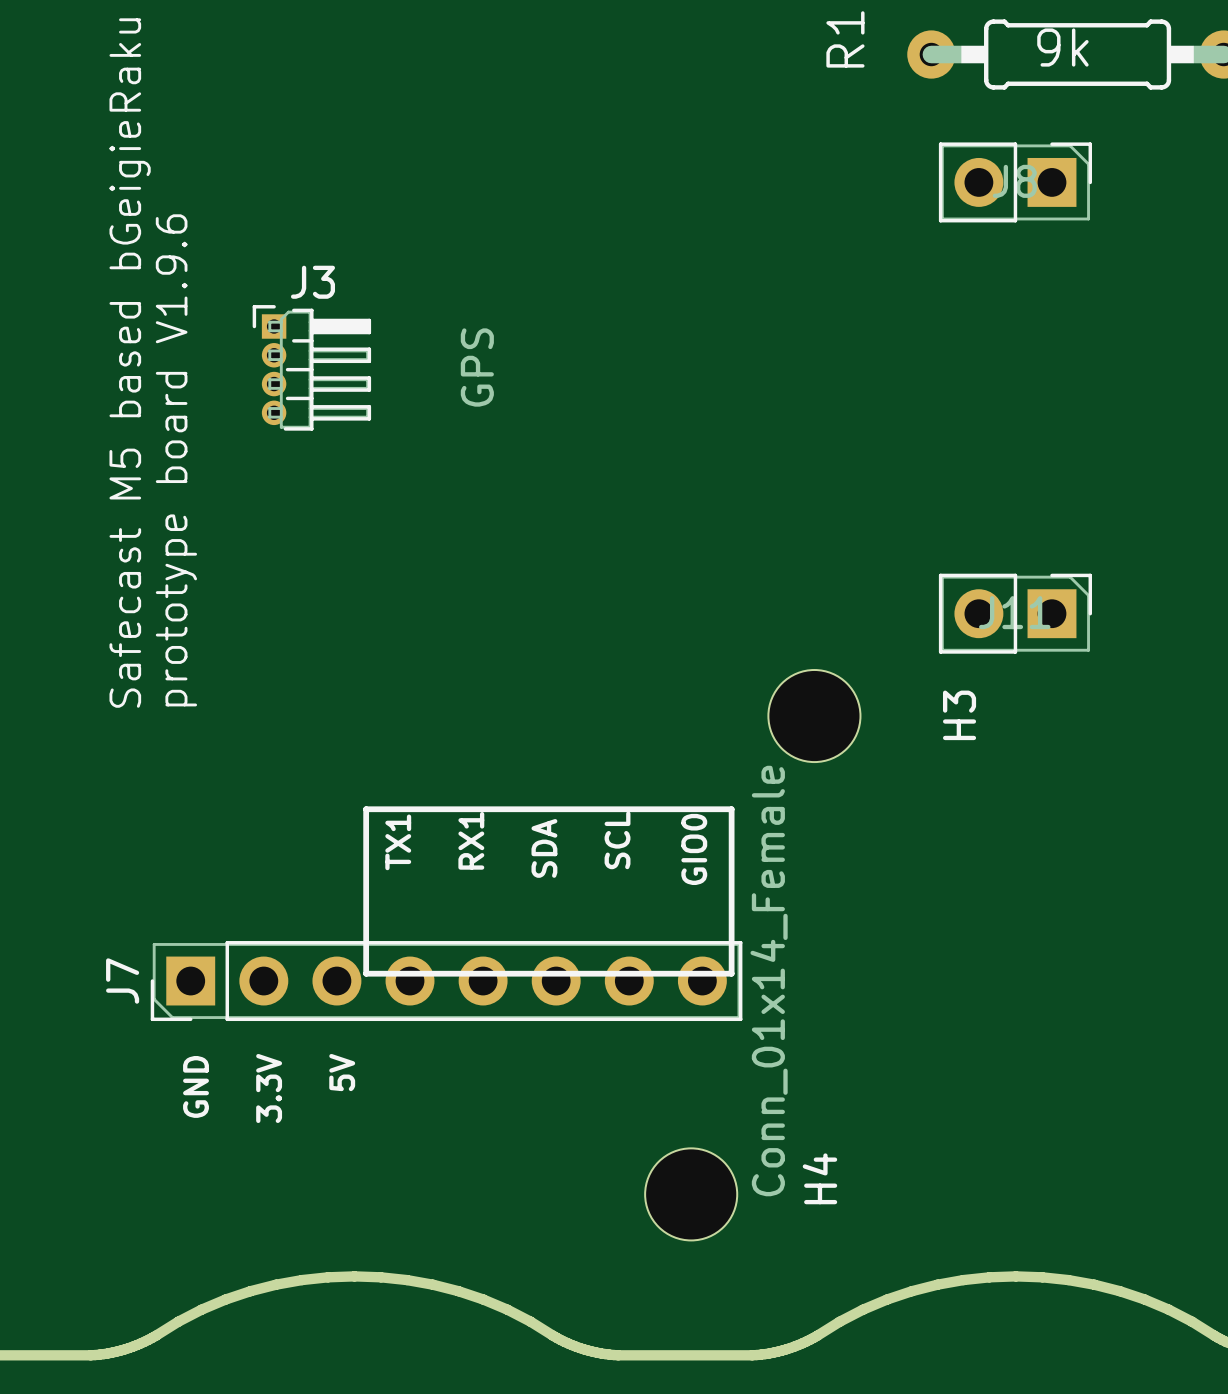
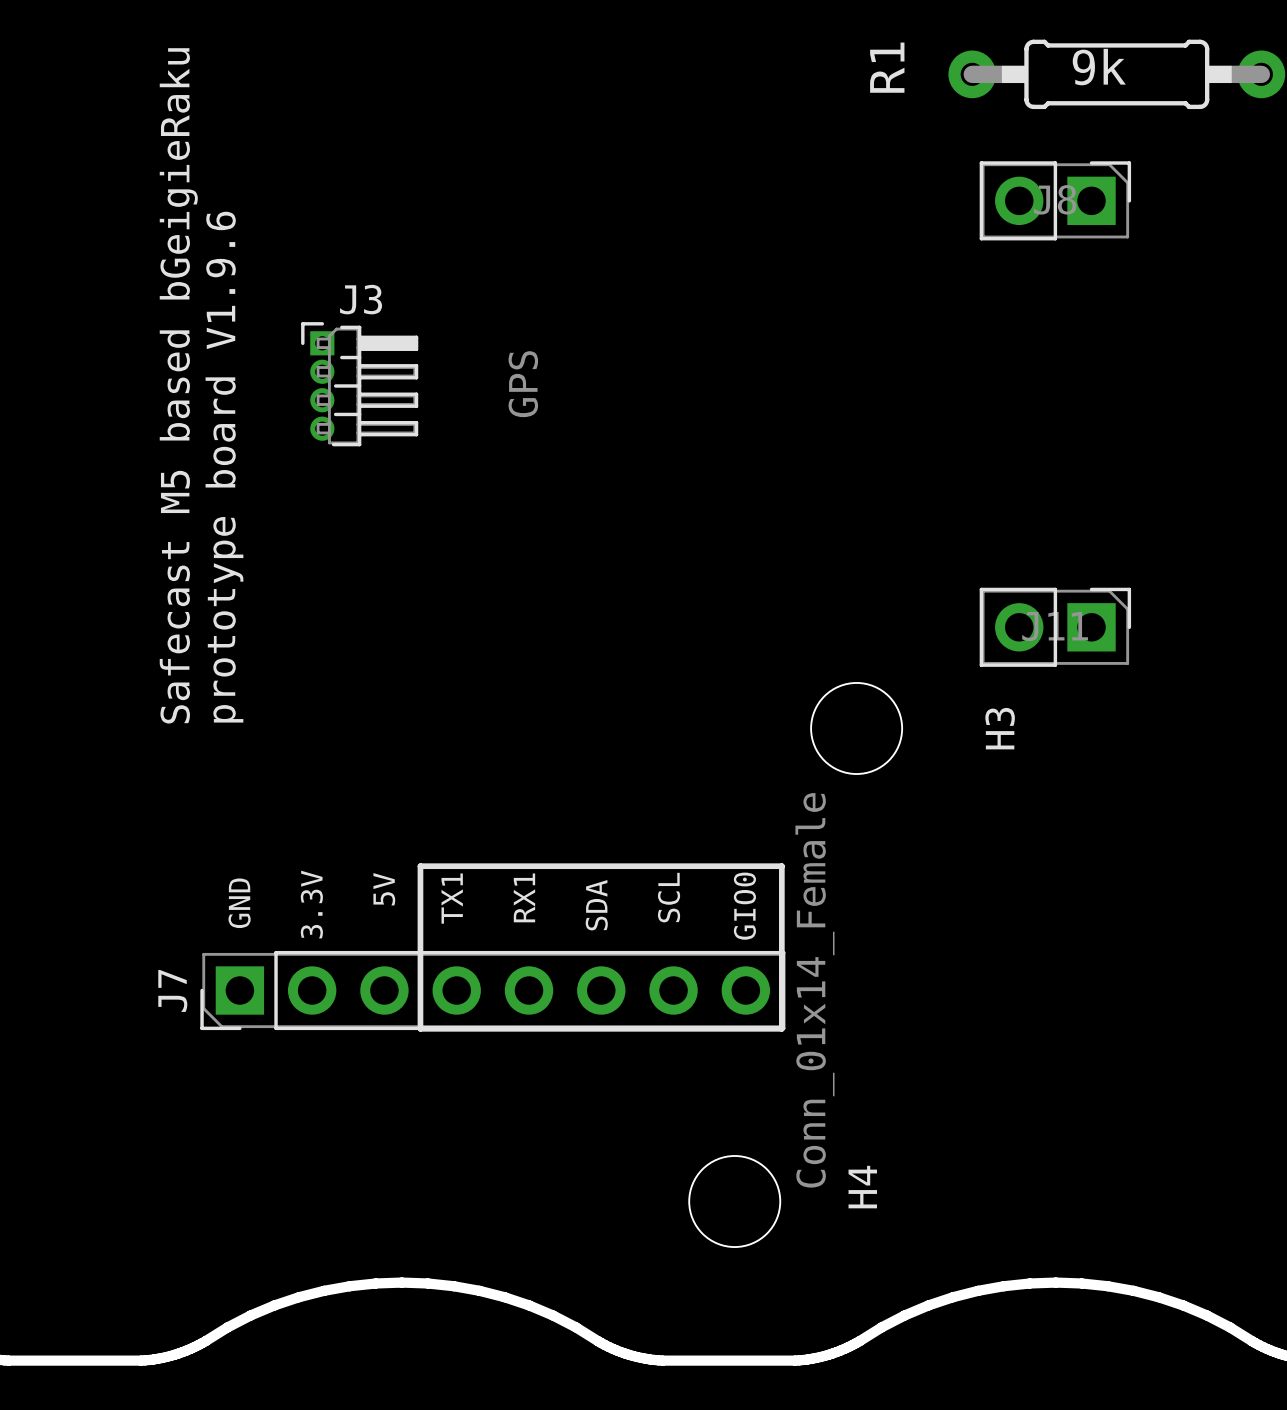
line: (366, 809) (366, 973) (731, 973) (731, 809) (366, 809) -> (420, 866) (420, 1028) (781, 1028) (781, 866) (420, 866)
text position: RX1 (471, 840) -> RX1 (524, 897)
text position: SCL (617, 840) -> SCL (669, 897)
text position: TX1 (398, 842) -> TX1 (452, 898)
text position: SDA (544, 848) -> SDA (596, 905)
text position: GIO0 (694, 849) -> GIO0 (744, 906)
text position: 5V (342, 1072) -> 5V (384, 889)
text position: GND (196, 1086) -> GND (239, 903)
text position: 3.3V (269, 1088) -> 3.3V (311, 904)

